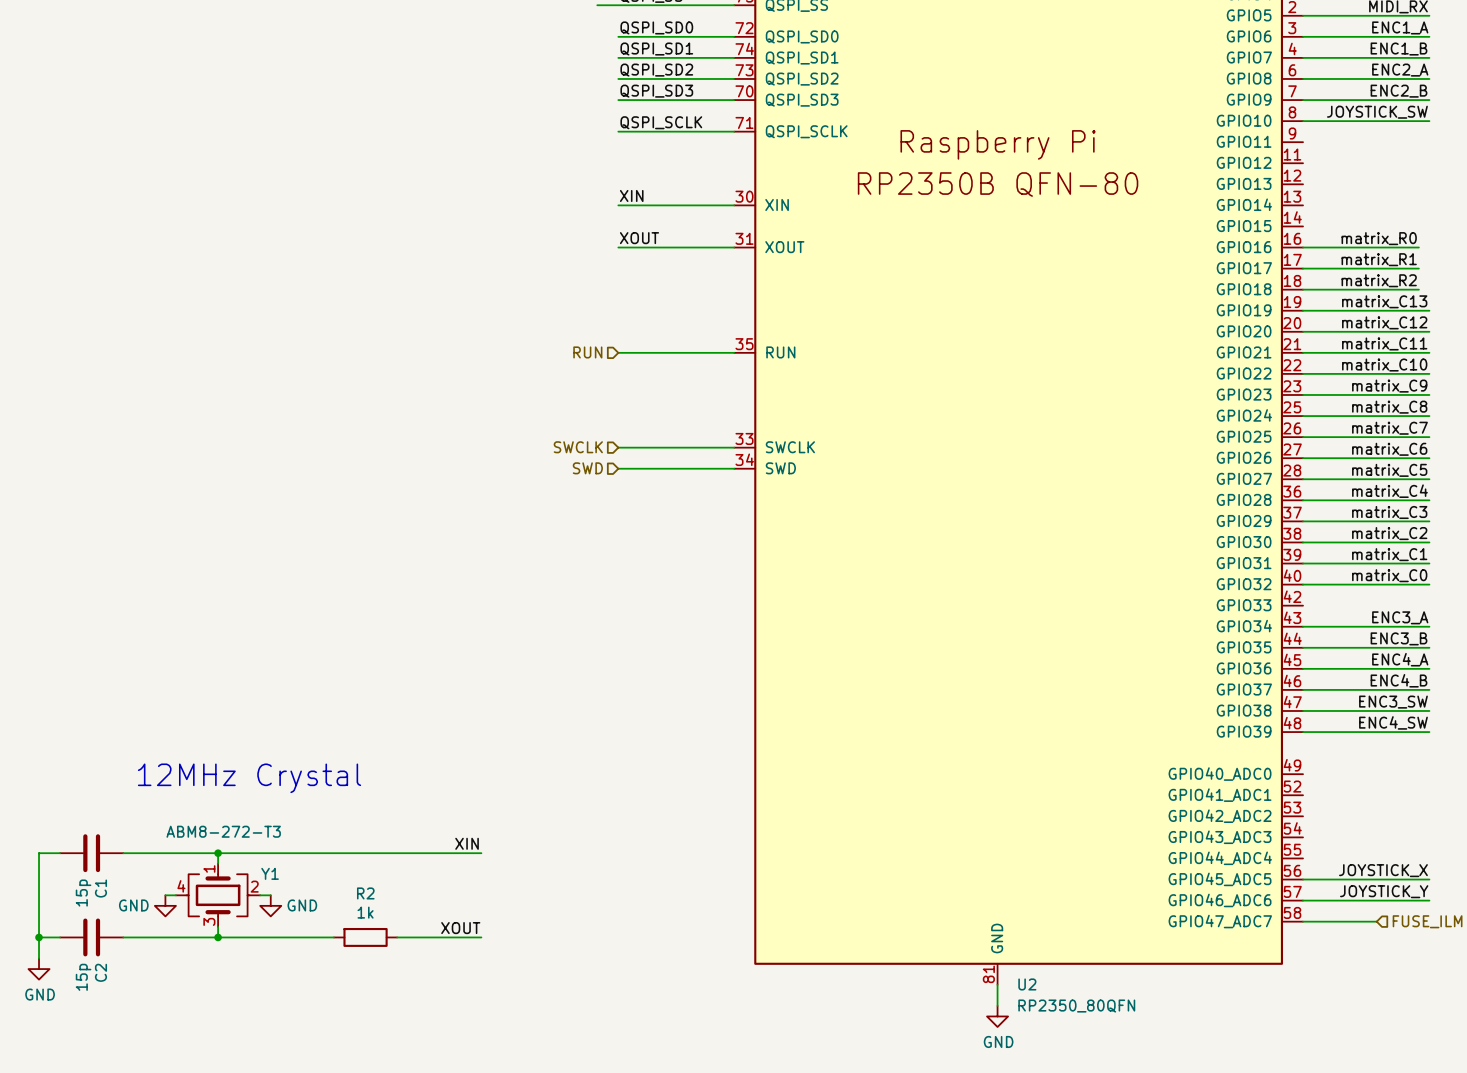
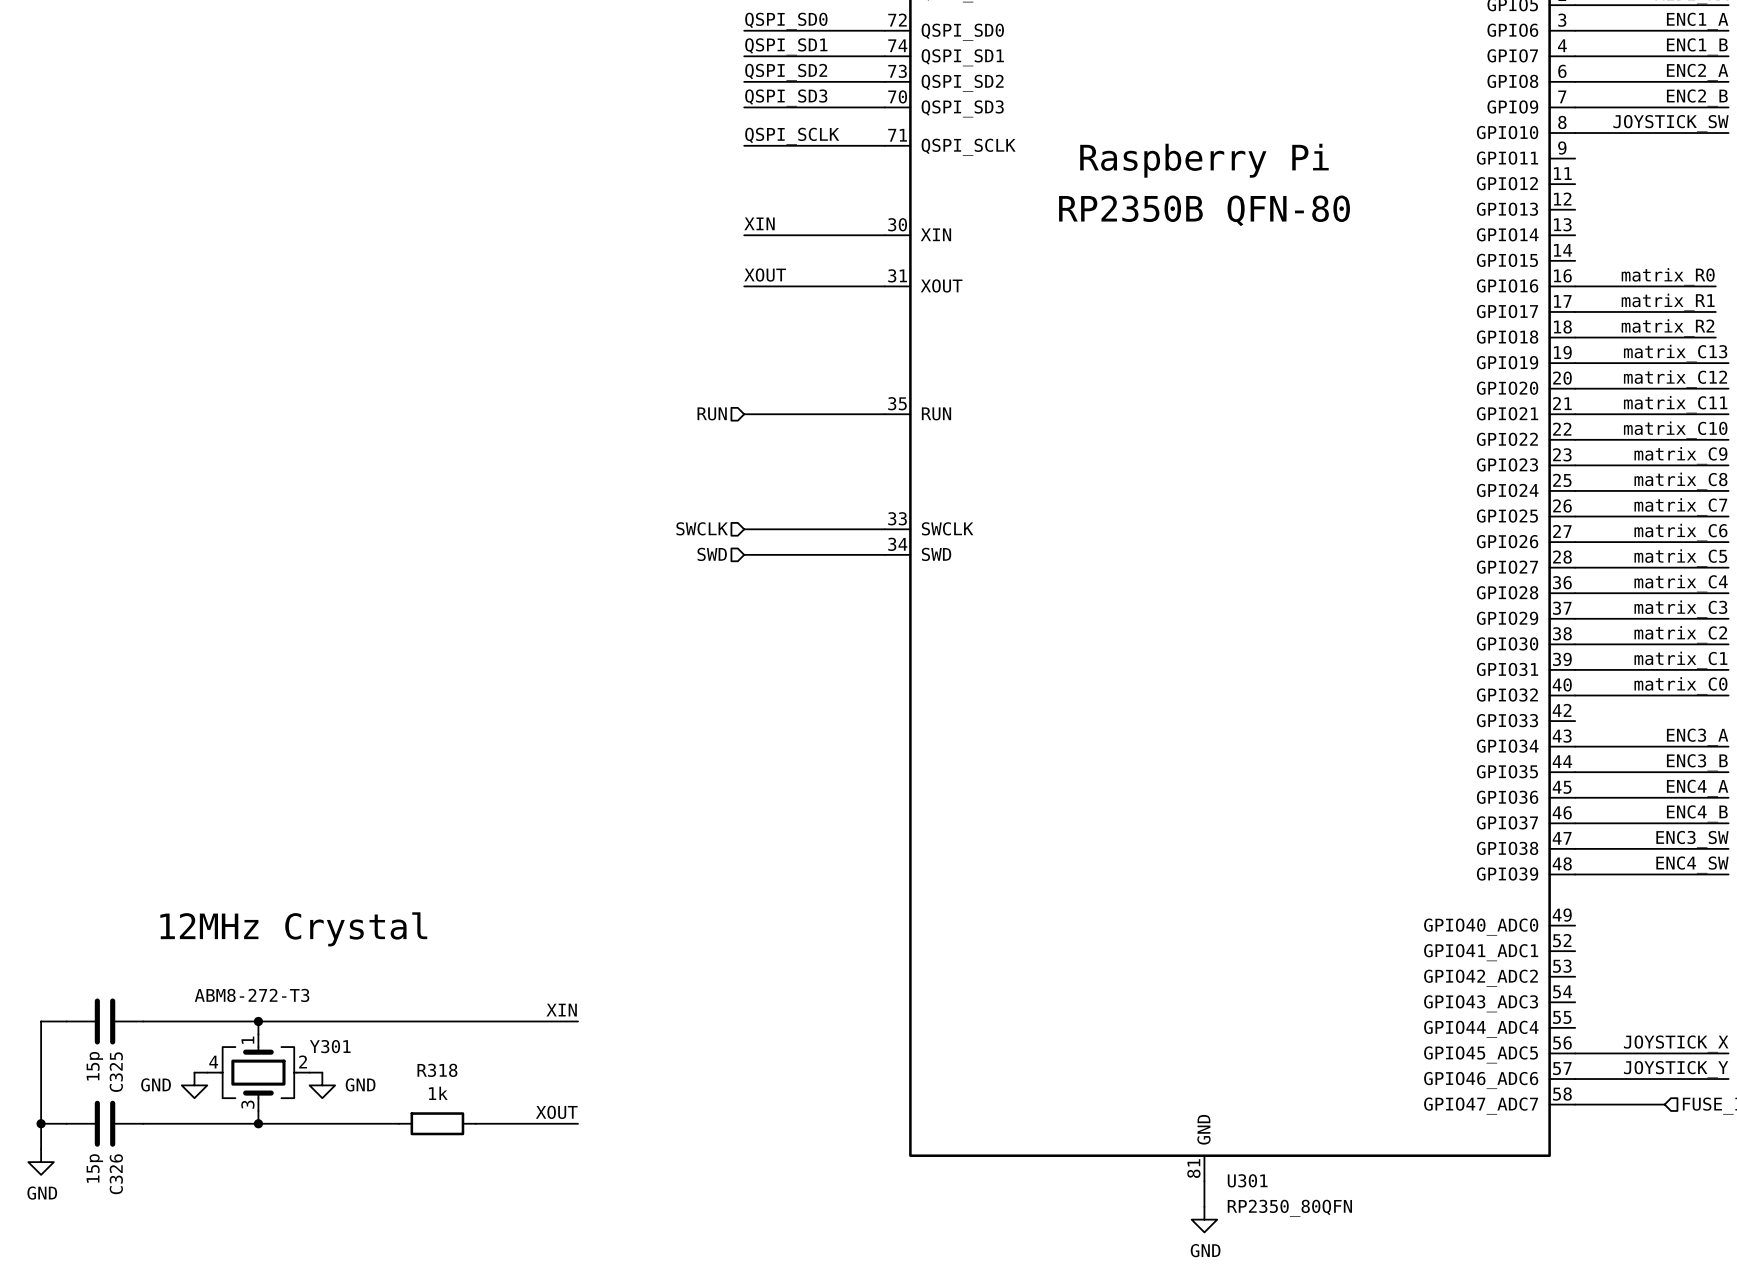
Y1 name: Y1 (270, 873) -> Y301 (330, 1046)
C1 name: C1 (100, 888) -> C325 (116, 1072)
R2 name: R2 (365, 893) -> R318 (437, 1070)
C2 name: C2 (100, 972) -> C326 (116, 1174)
U2 name: U2 (1027, 984) -> U301 (1247, 1180)

